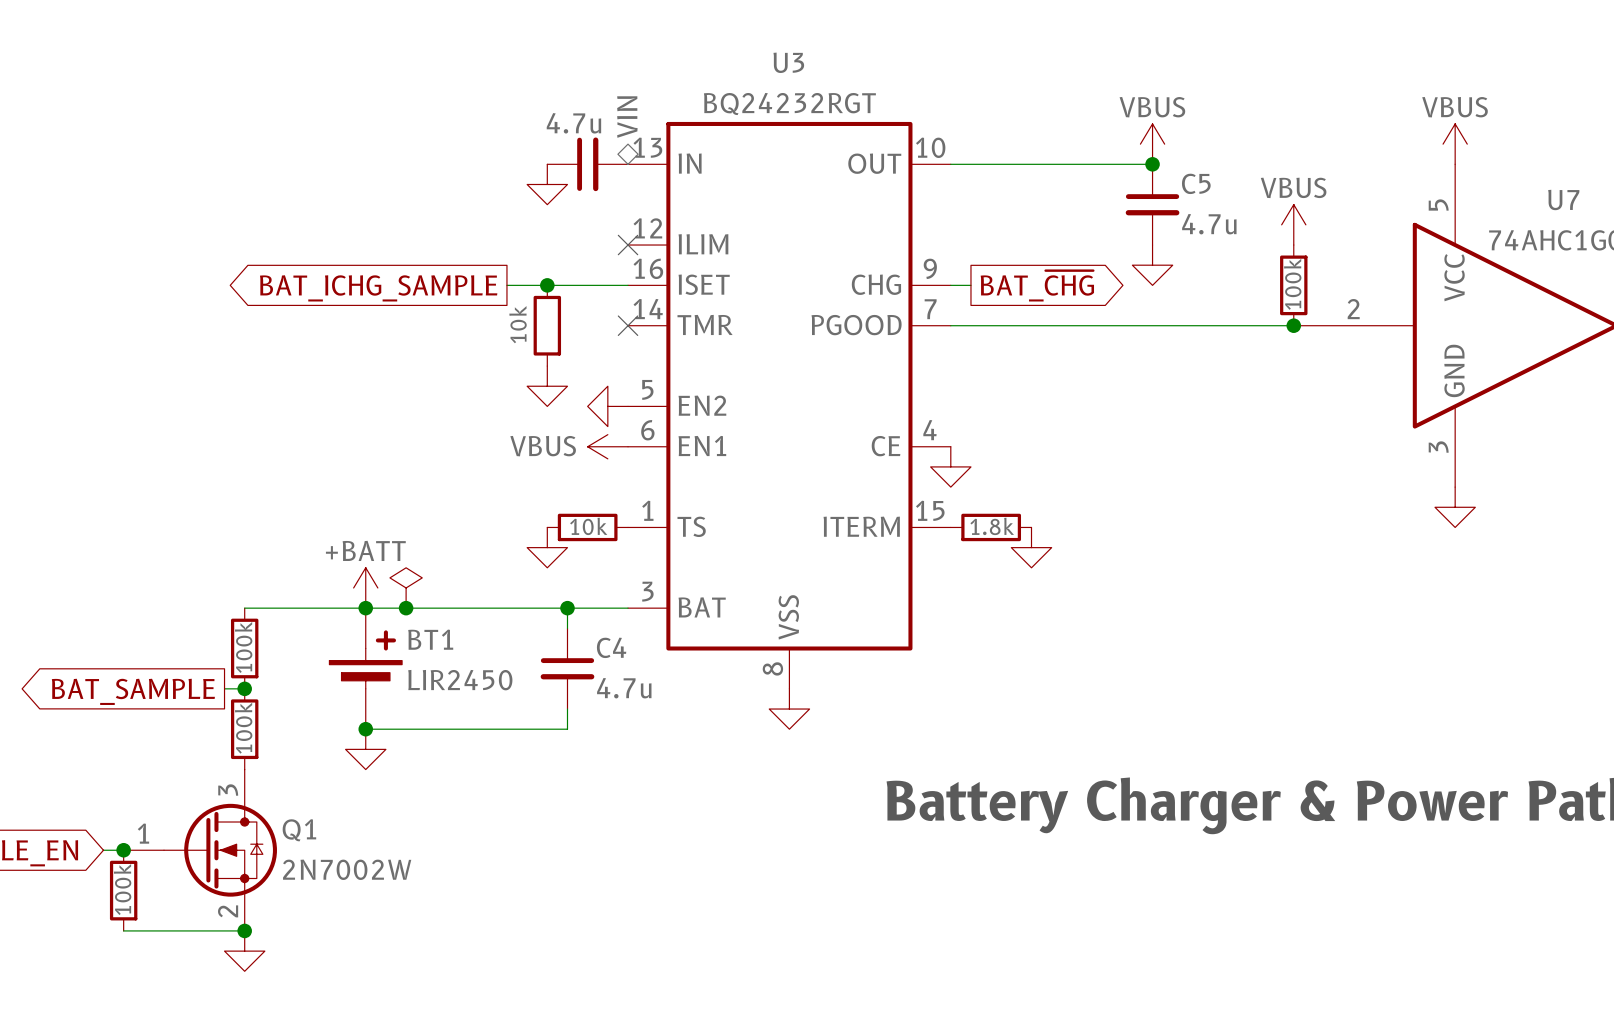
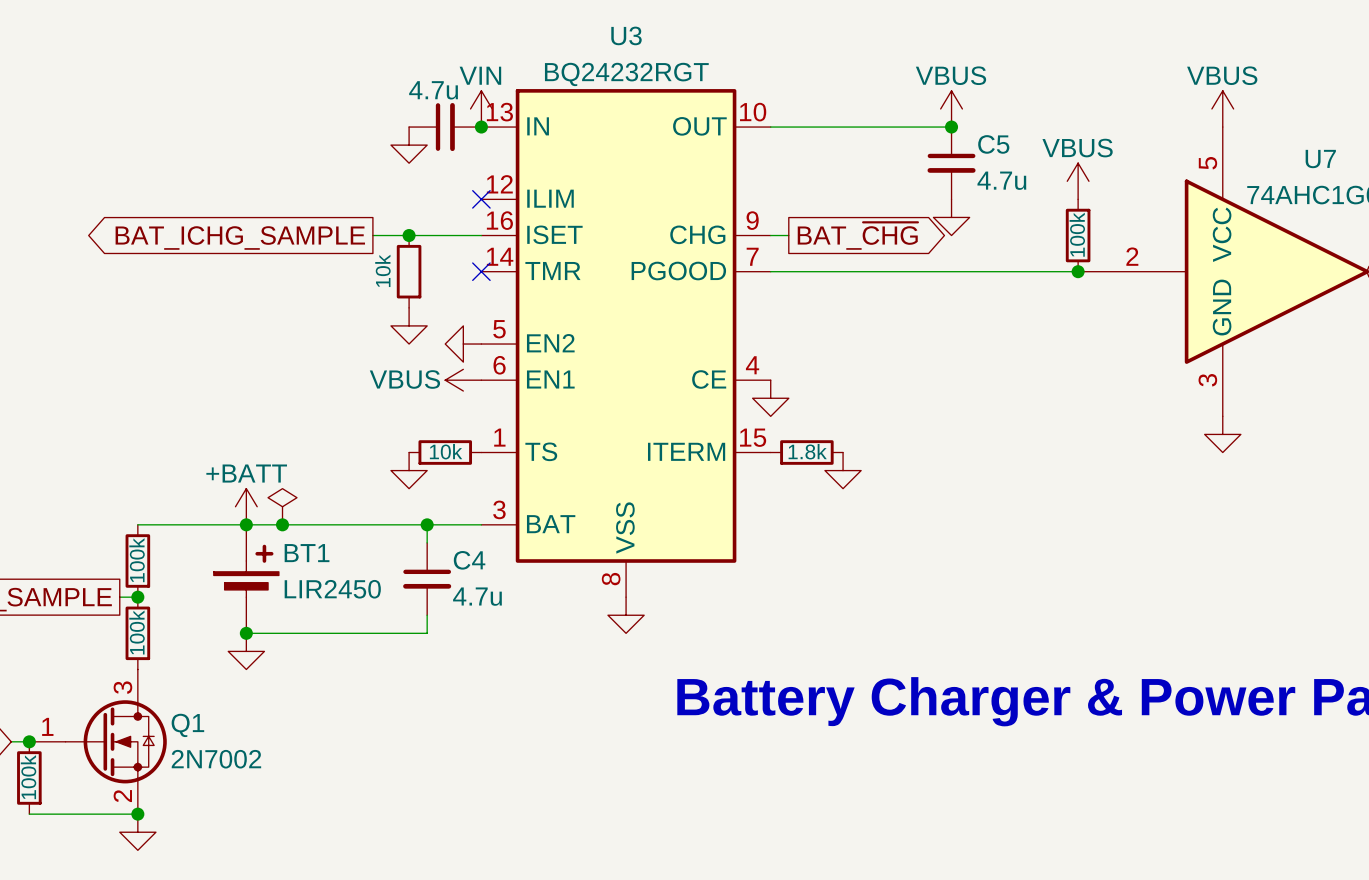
hierarchical label: VIN (627, 117) -> none
power symbol: none -> VIN (481, 108)
junction: none -> (481, 127)
Q1 value: 2N7002W (347, 869) -> 2N7002 (216, 759)

